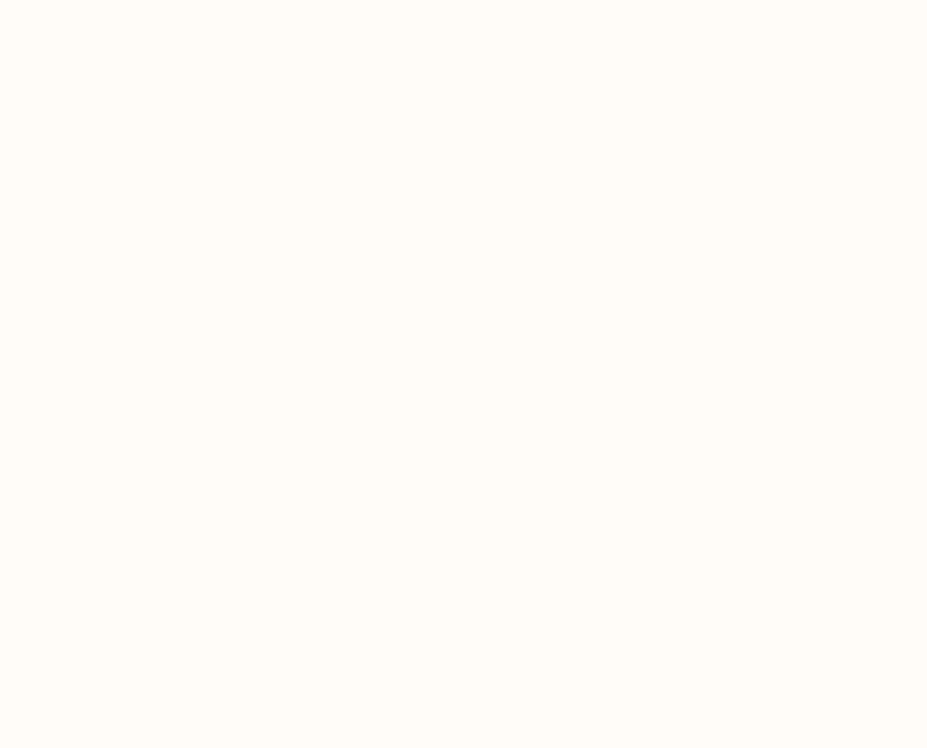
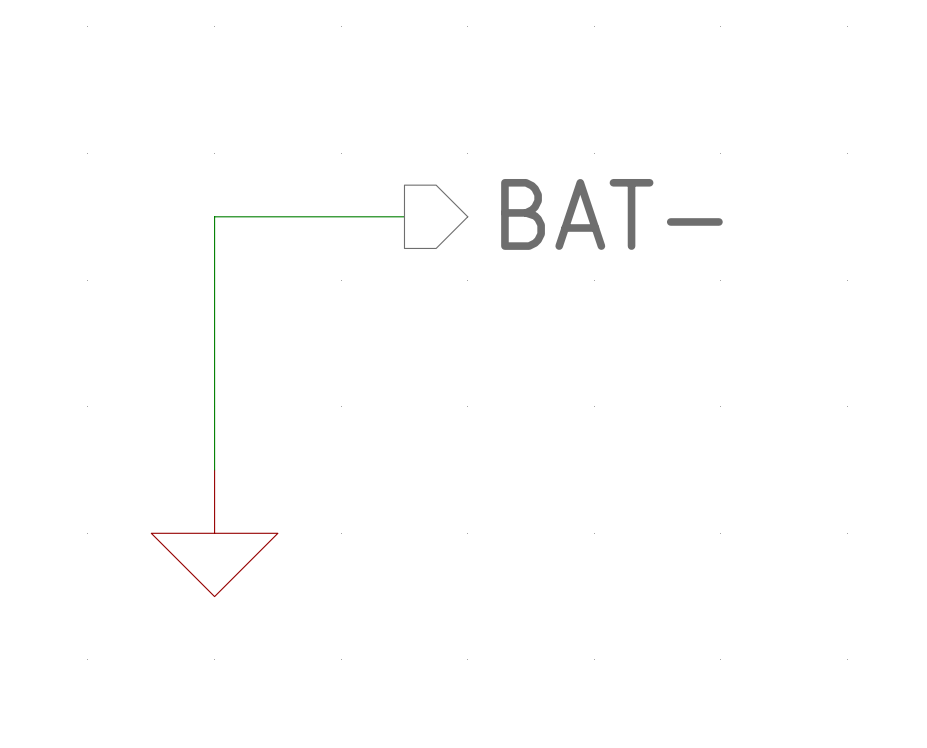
hierarchical label: none -> BAT- (611, 214)
wire: none -> (404, 216) (214, 216) (214, 470)
power symbol: none -> (214, 533)

